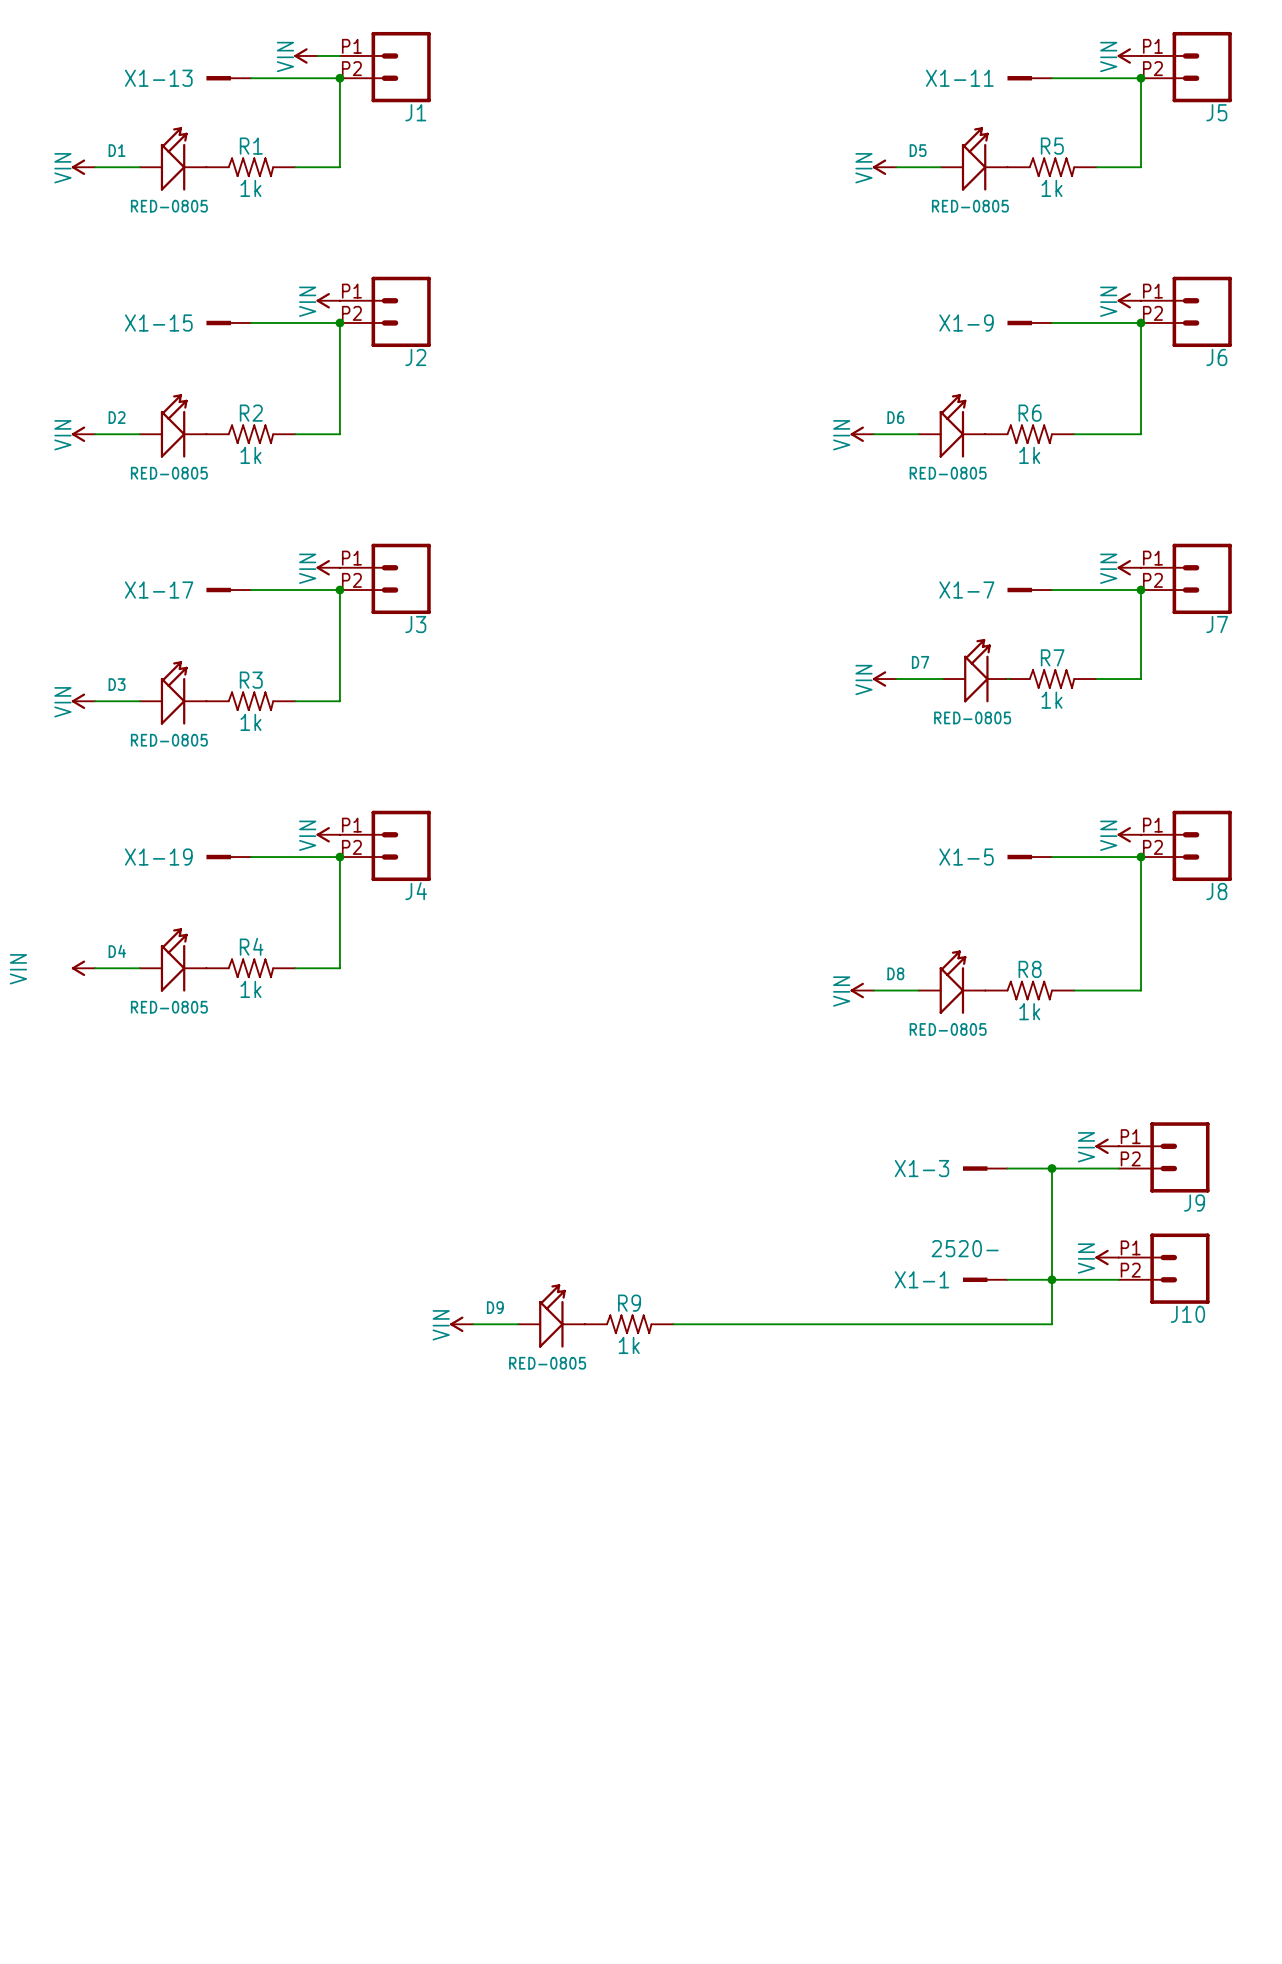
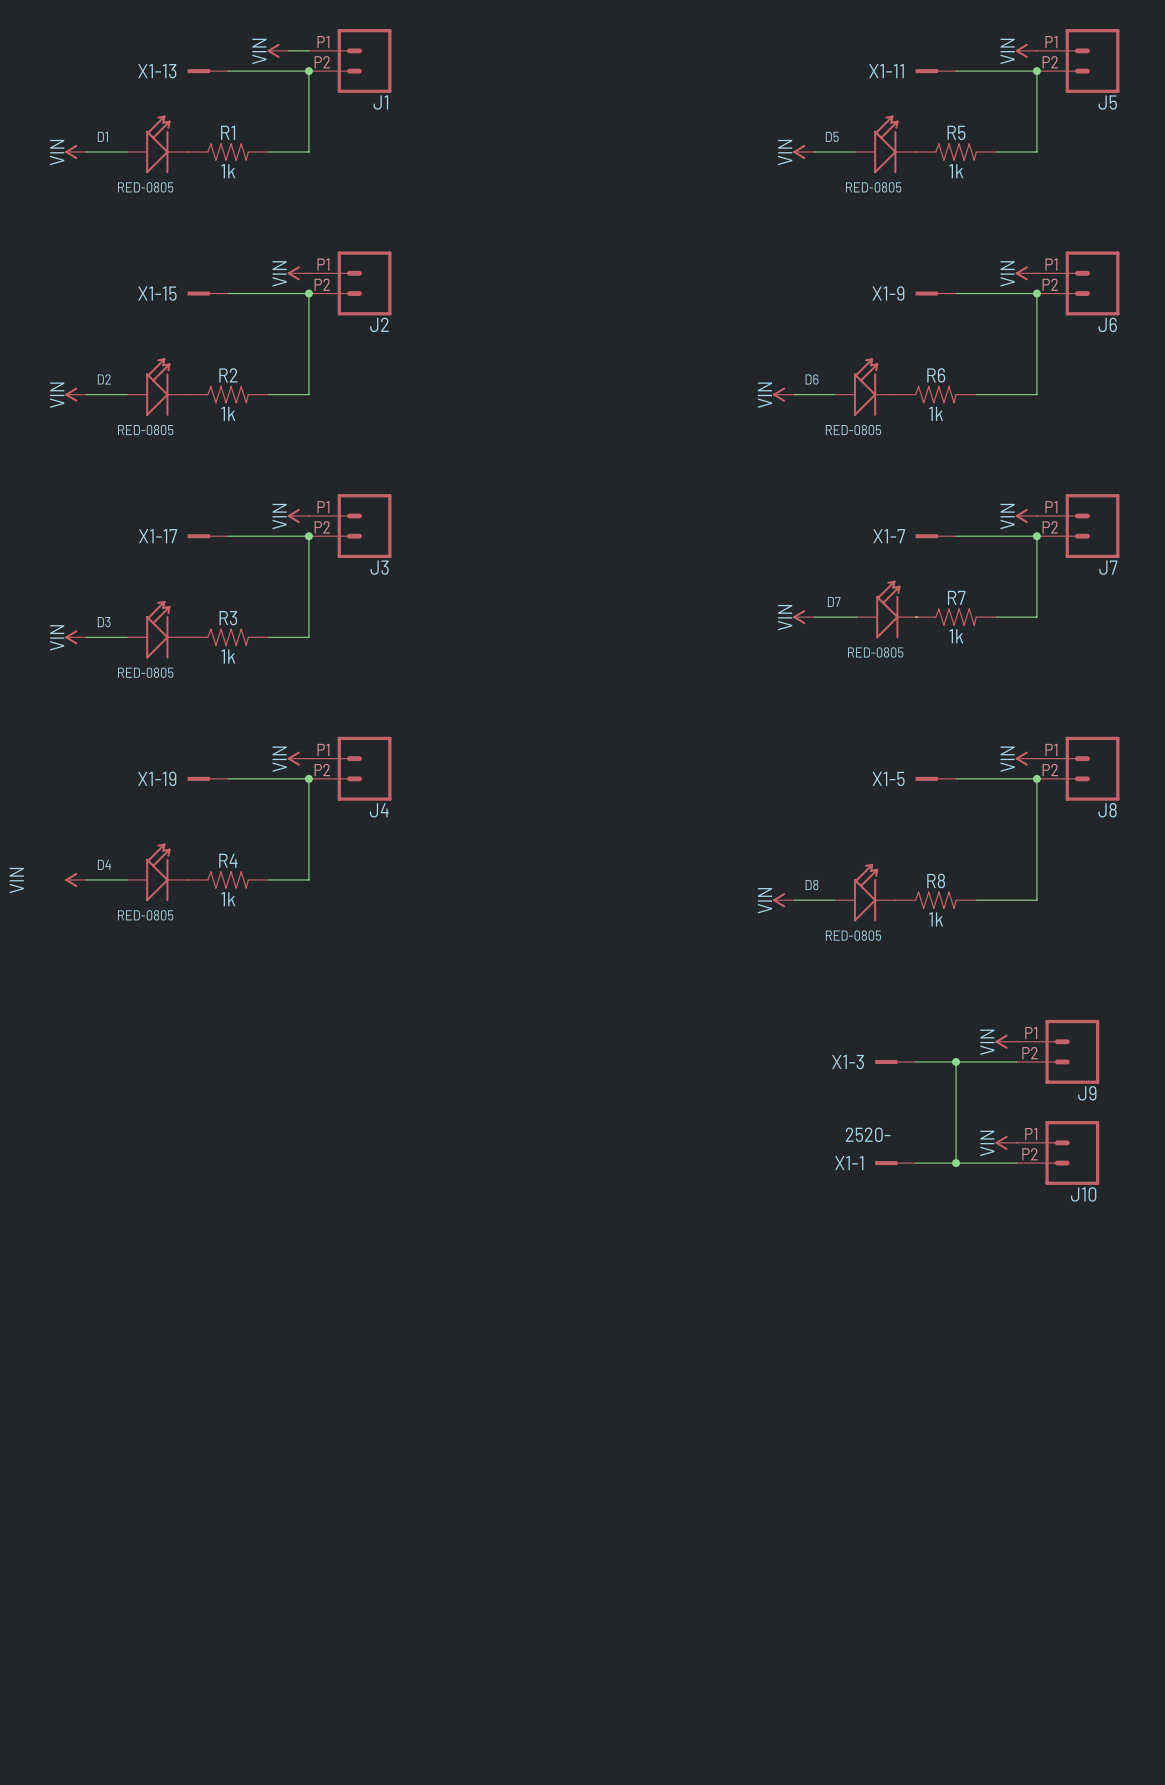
wire: (1051, 1279) (1051, 1324) (673, 1324) -> none
D9: RED-0805 (551, 1315) -> none
power symbol: VIN (461, 1324) -> none
wire: (473, 1324) (517, 1324) -> none
R9: 1k (629, 1324) -> none

